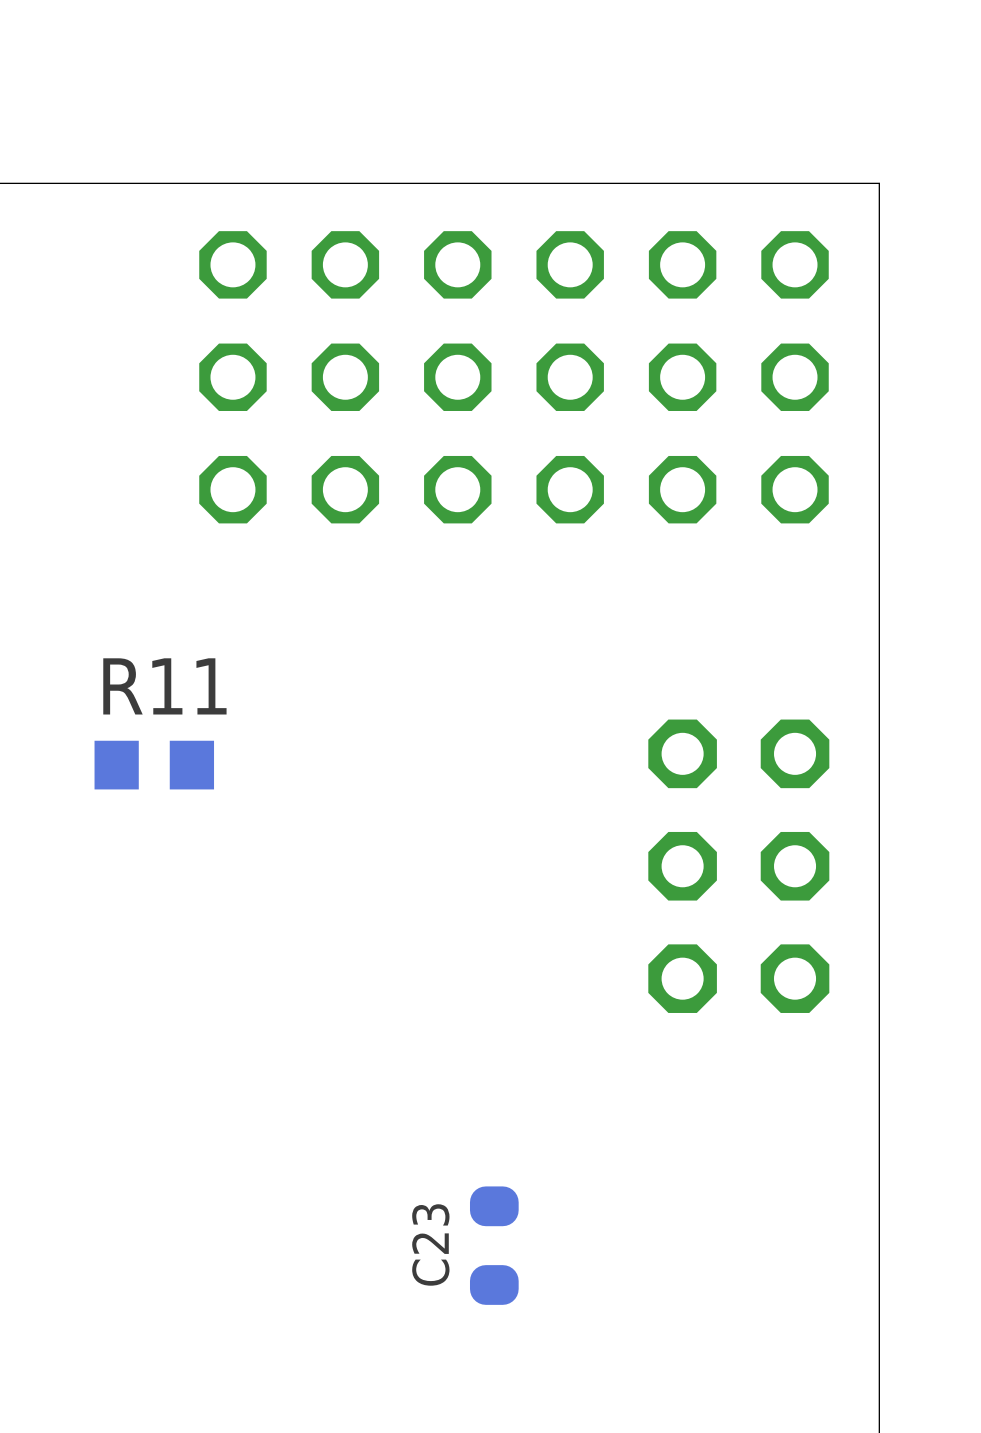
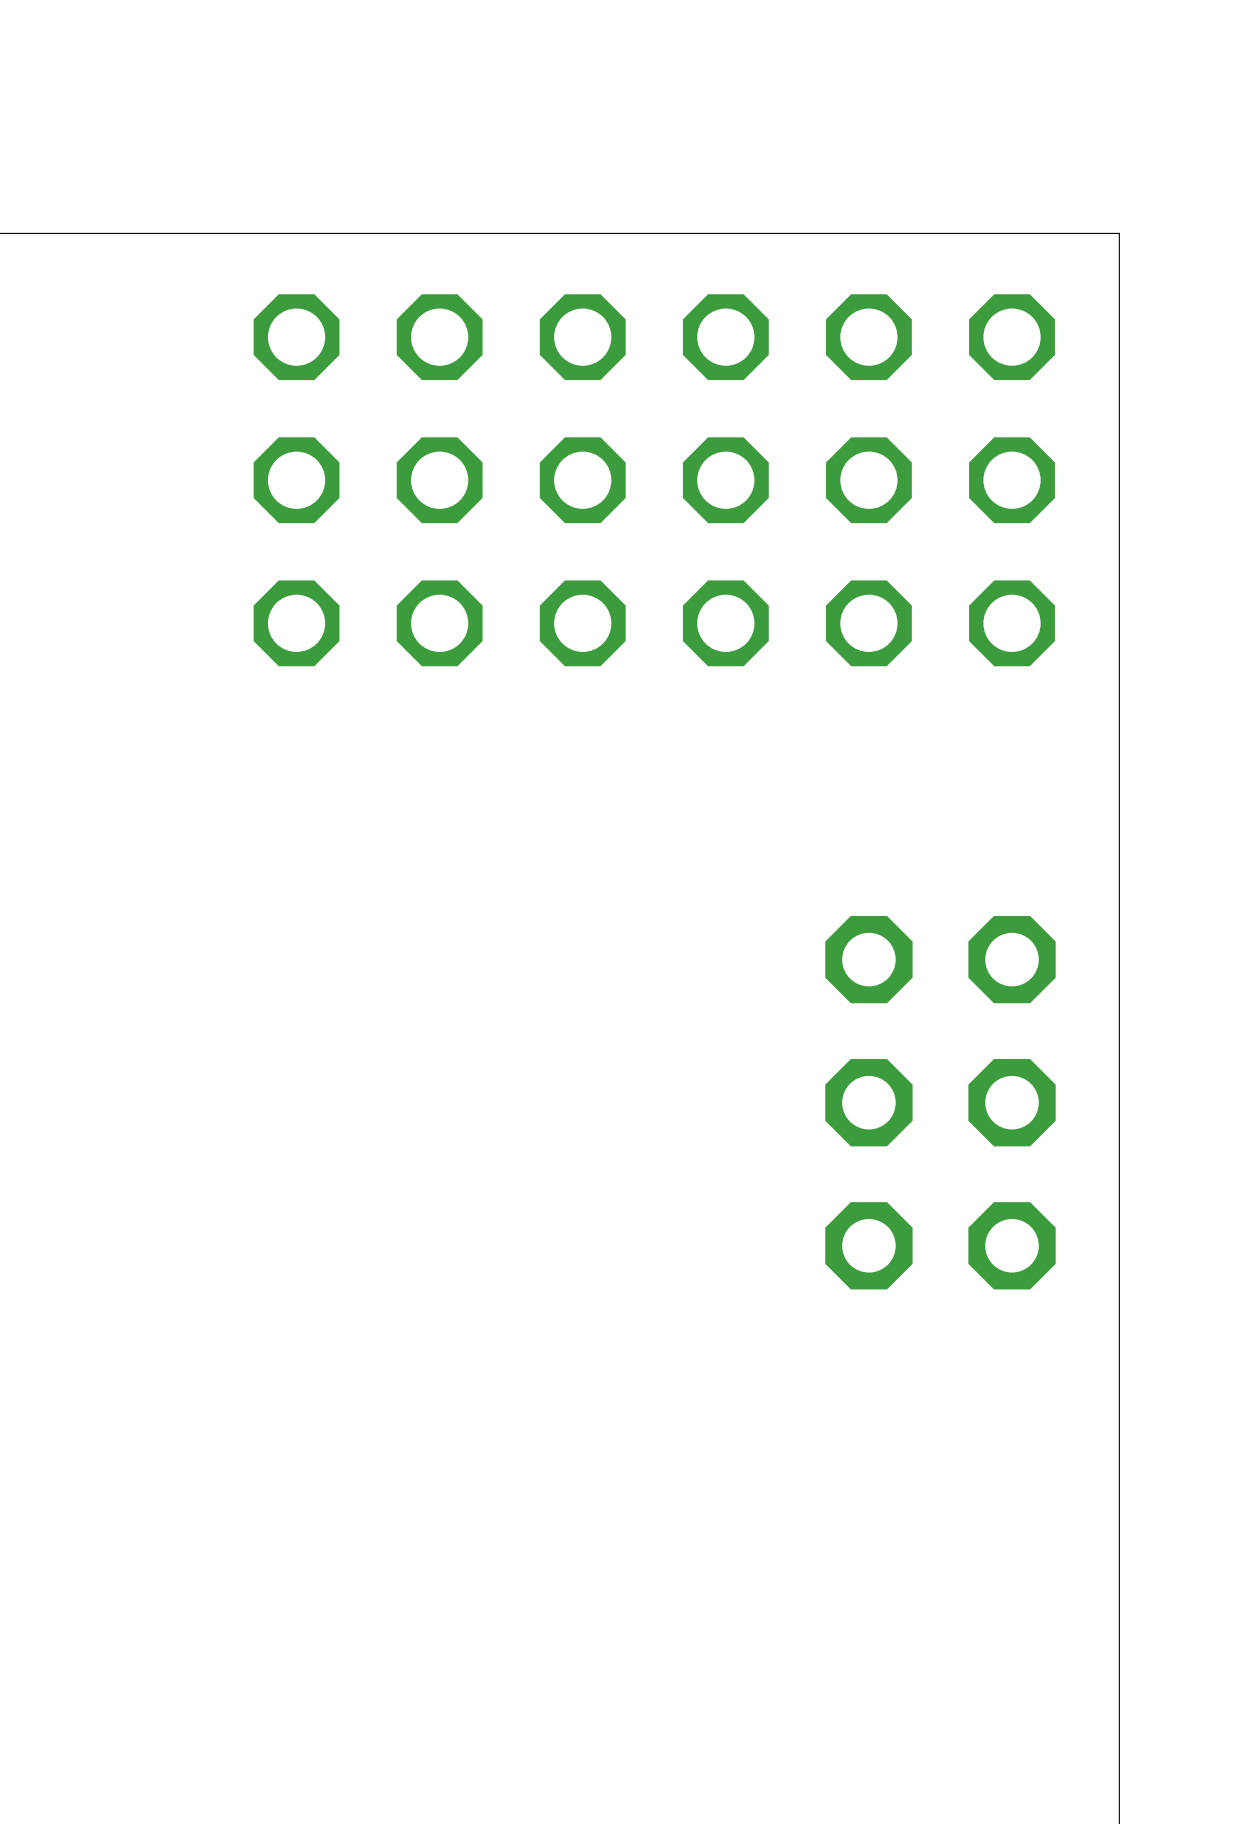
R11: (154, 765) -> none
C23: (494, 1245) -> none

